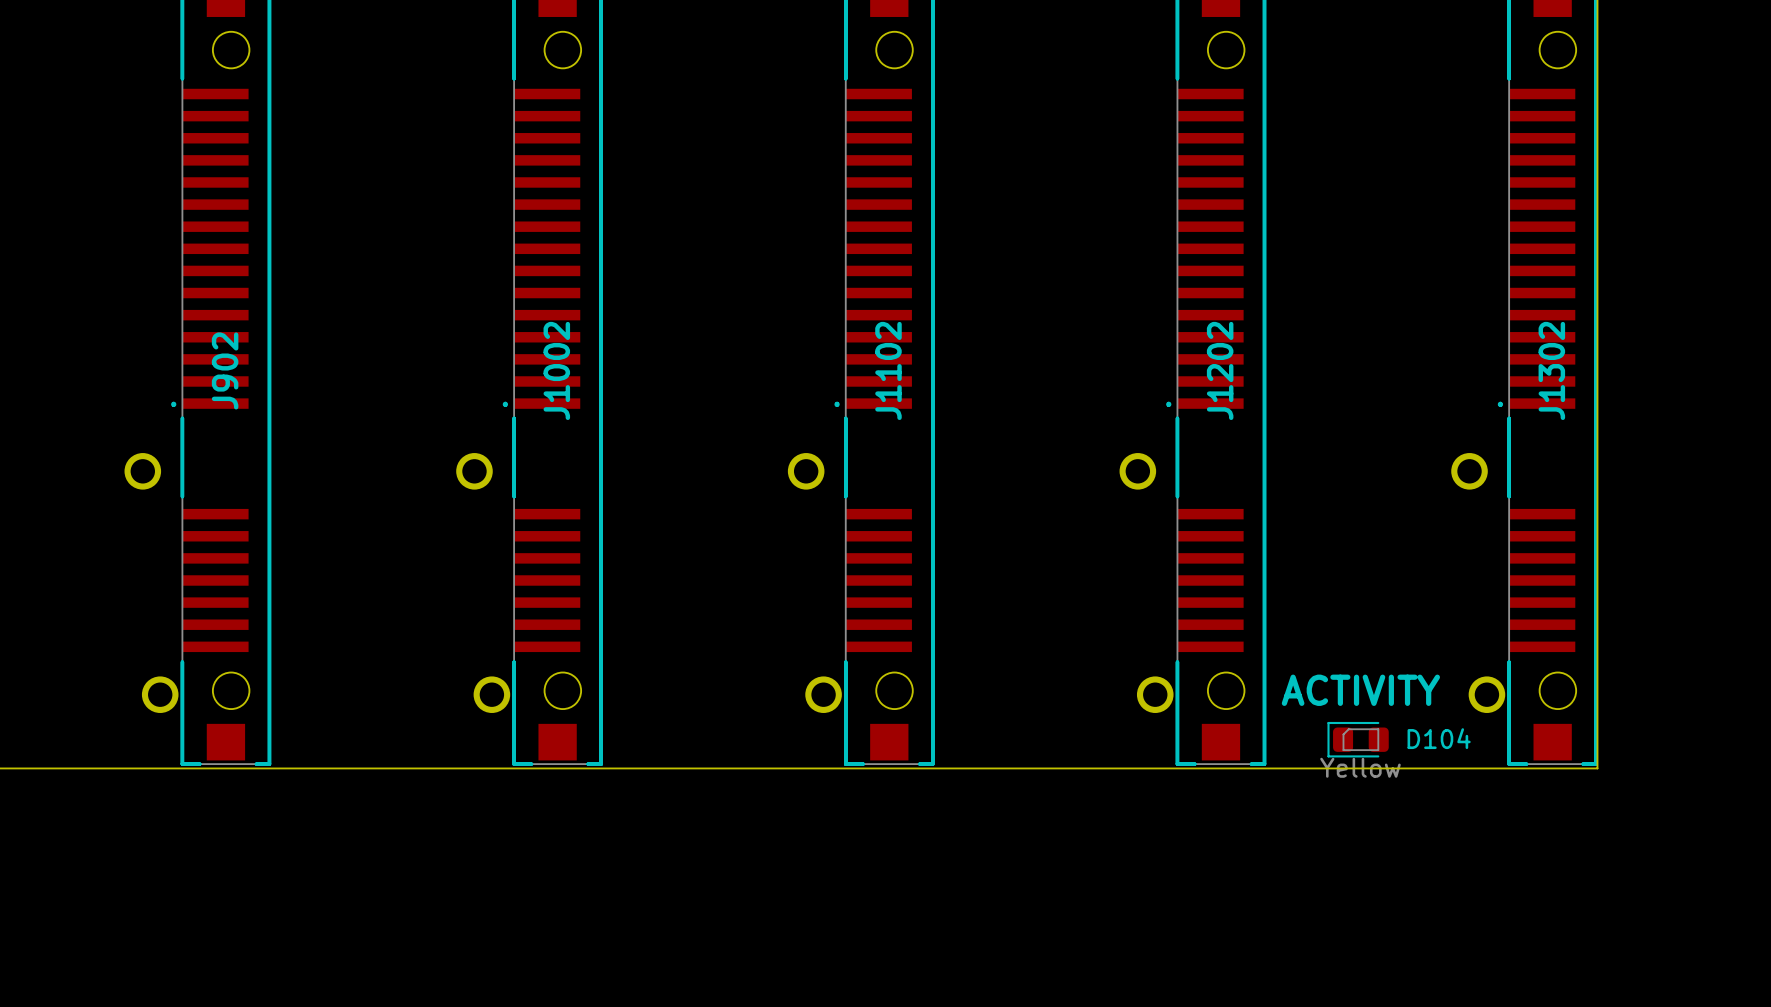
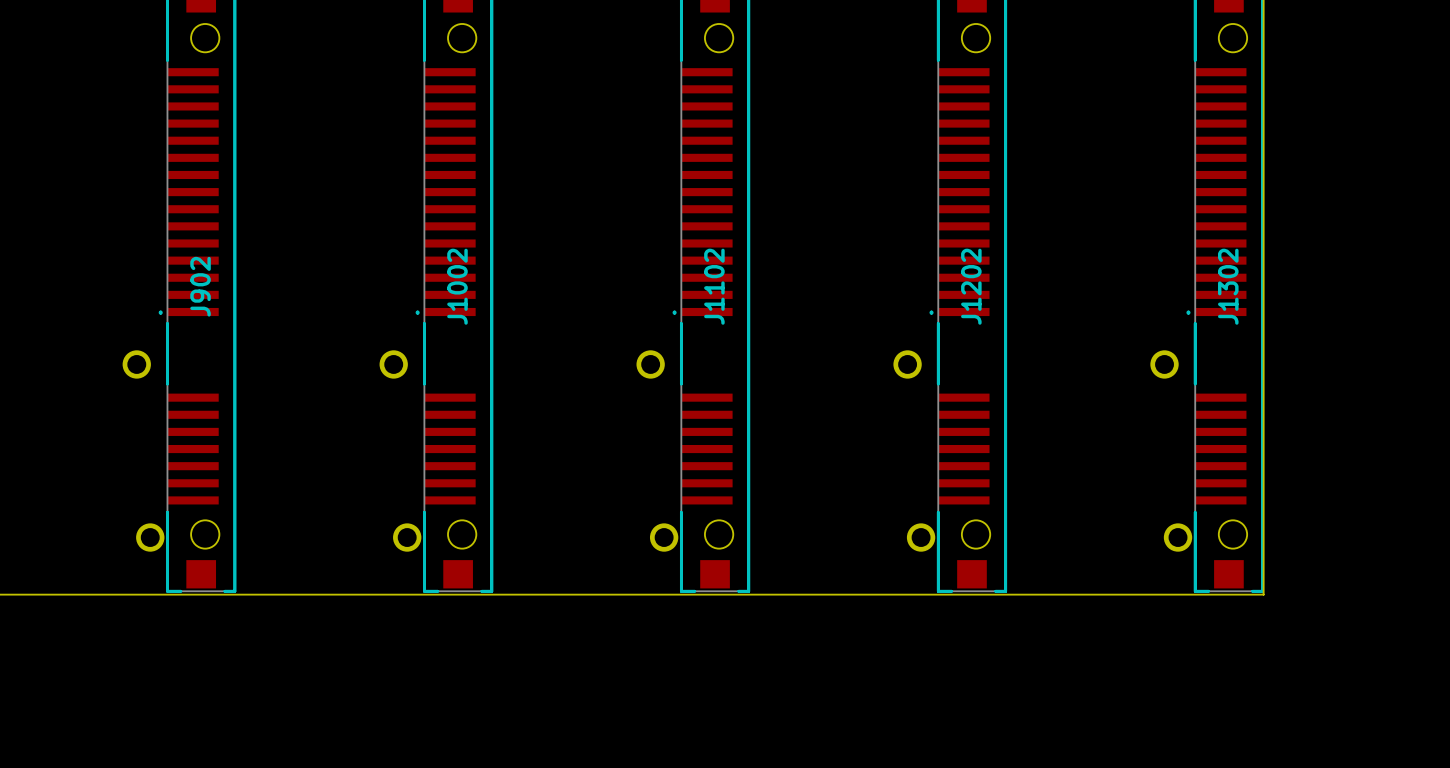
text: ACTIVITY (1360, 690) -> none
D104: Yellow (1358, 739) -> none

